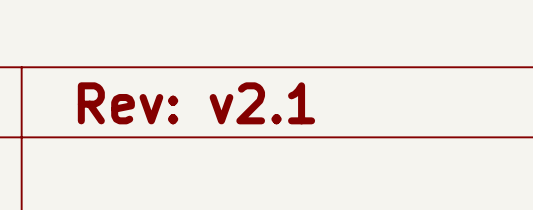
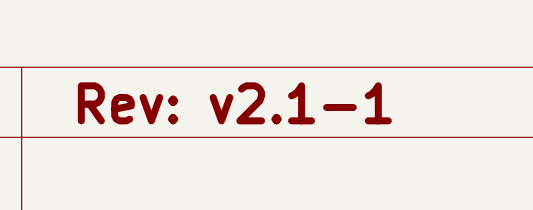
title block: Rev: v2.1 (196, 103) -> Rev: v2.1-1 (234, 103)

